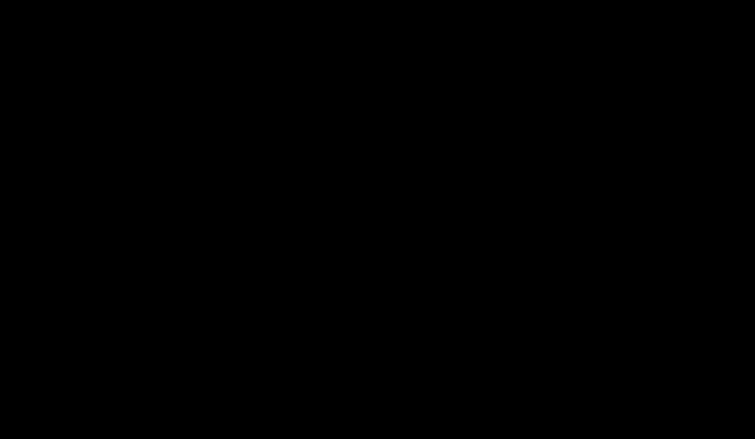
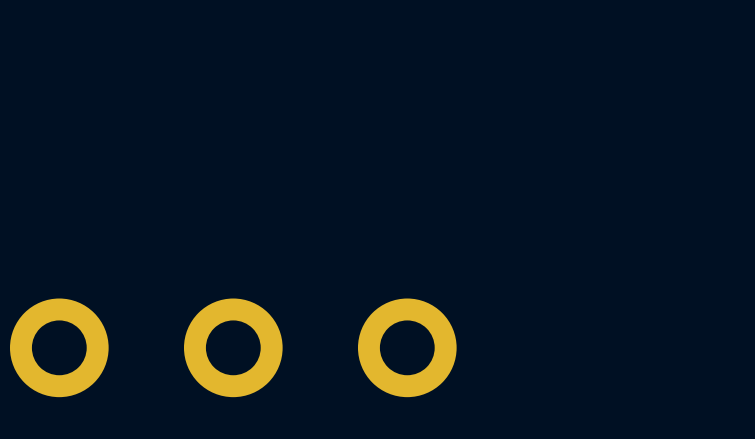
part: none -> (233, 347)

